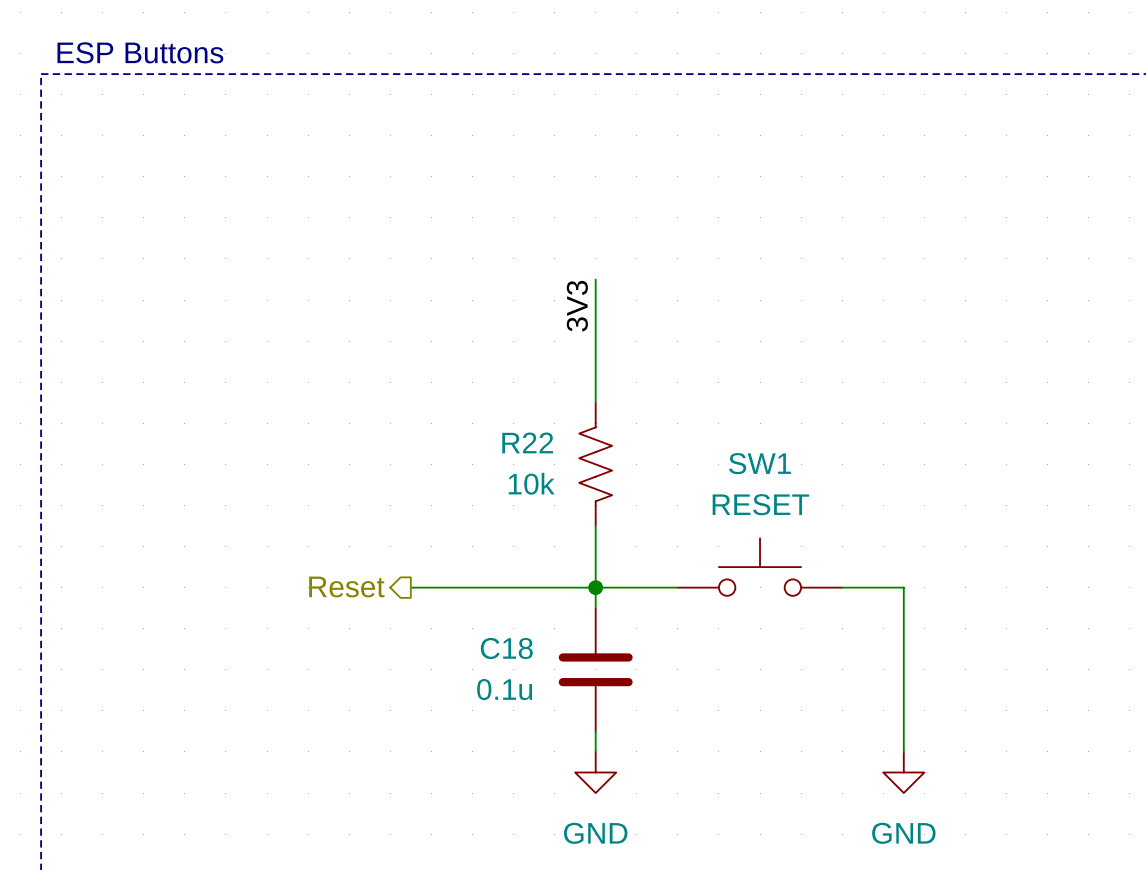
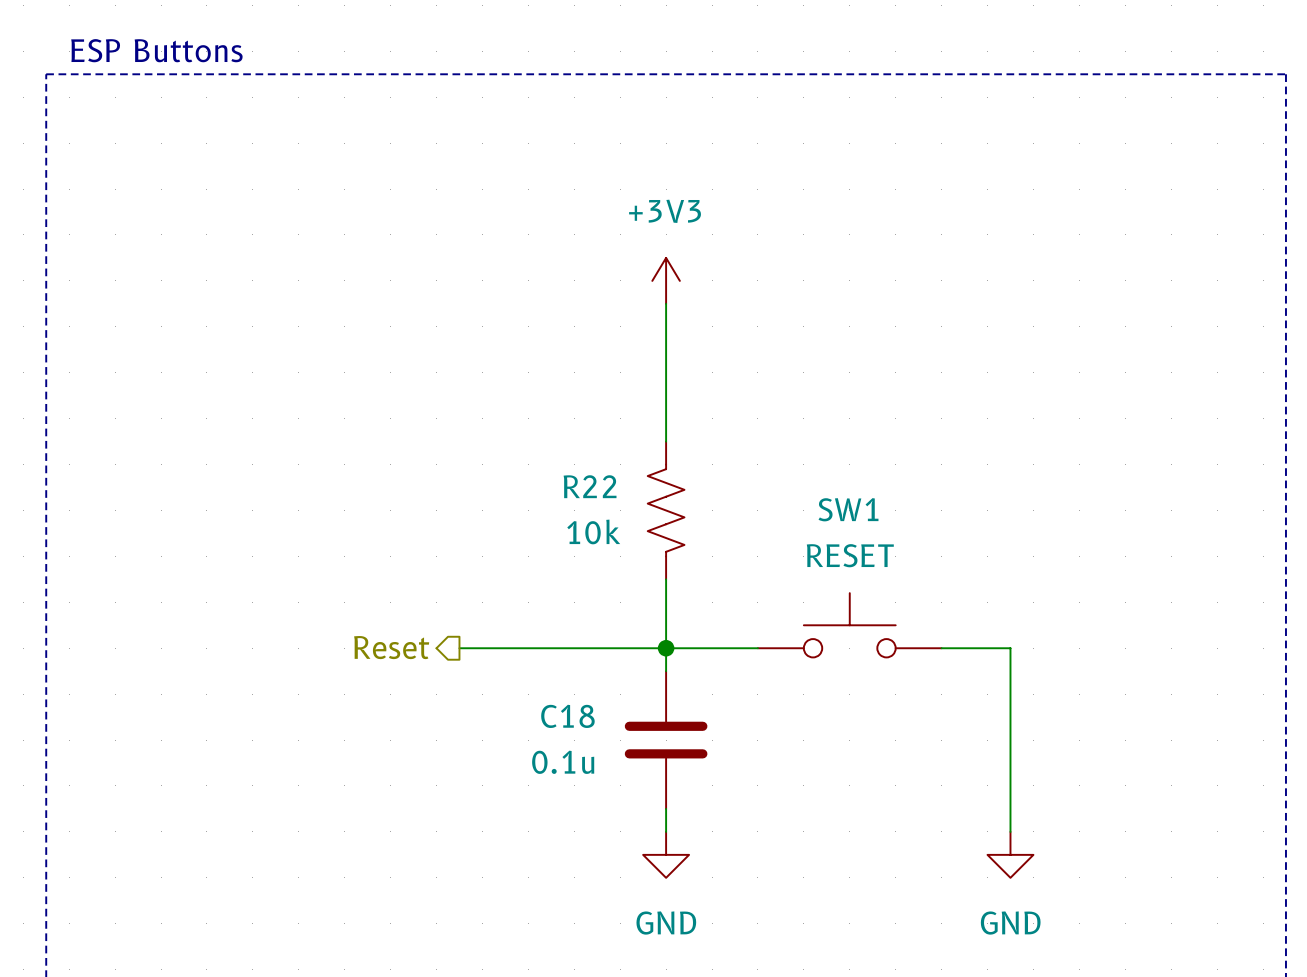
power symbol: none -> +3V3 (666, 280)
label: 3V3 (577, 306) -> none

